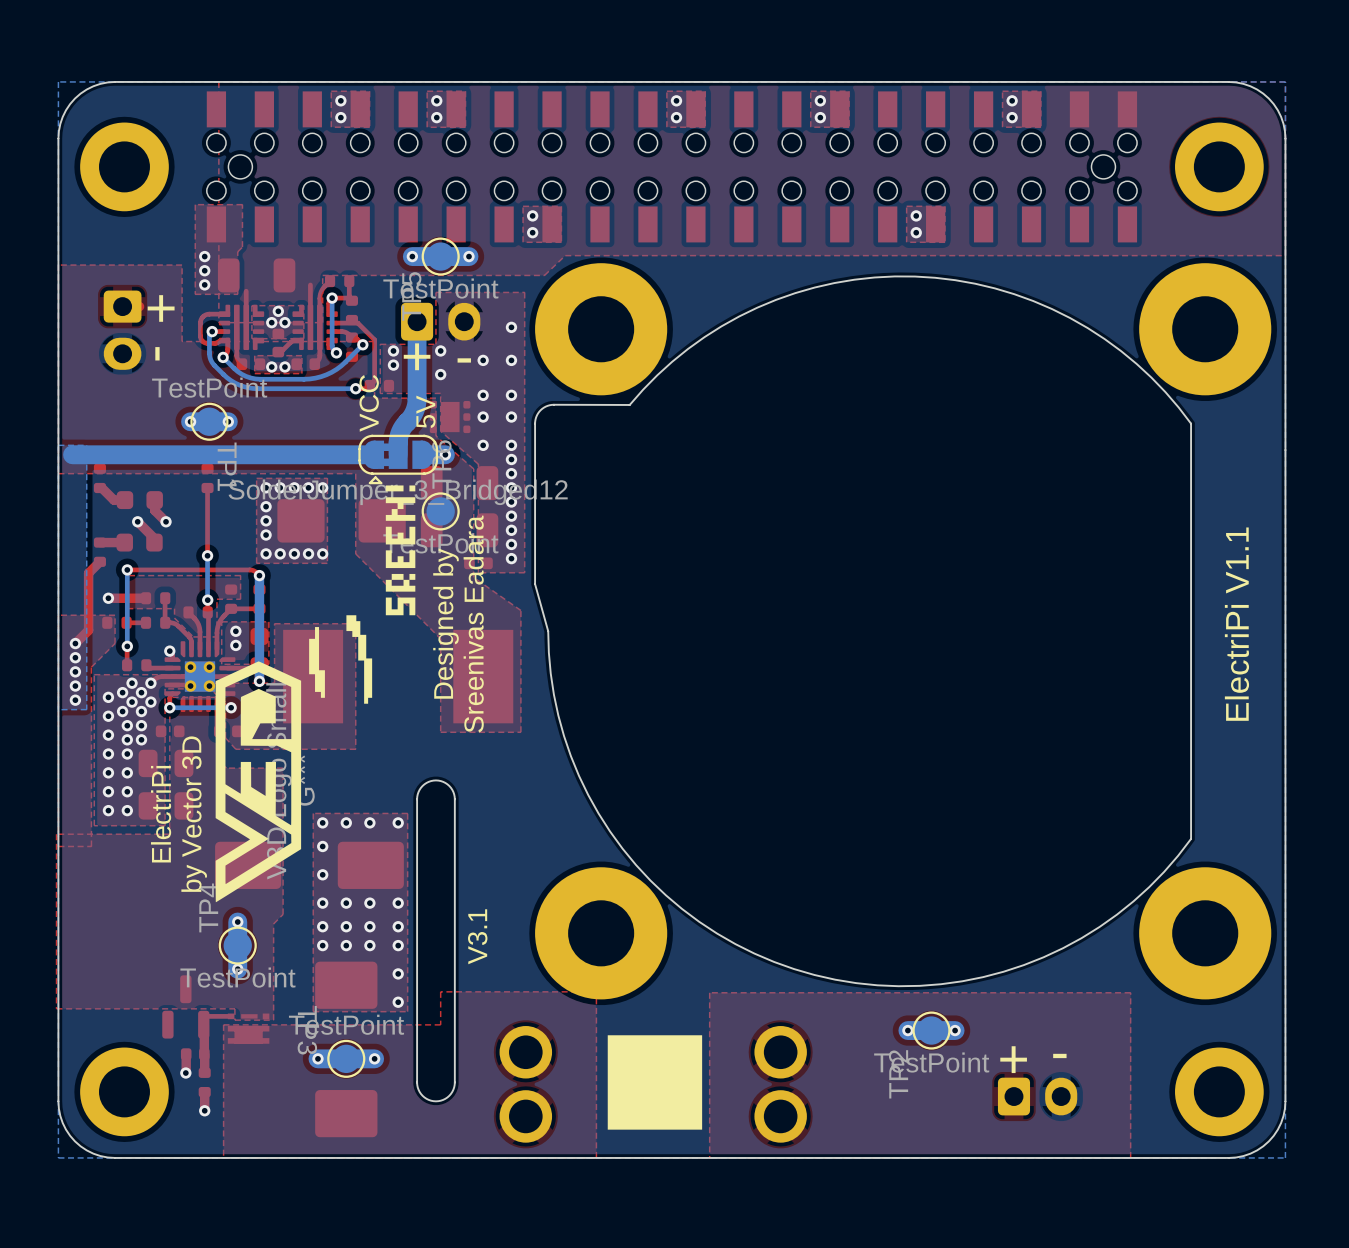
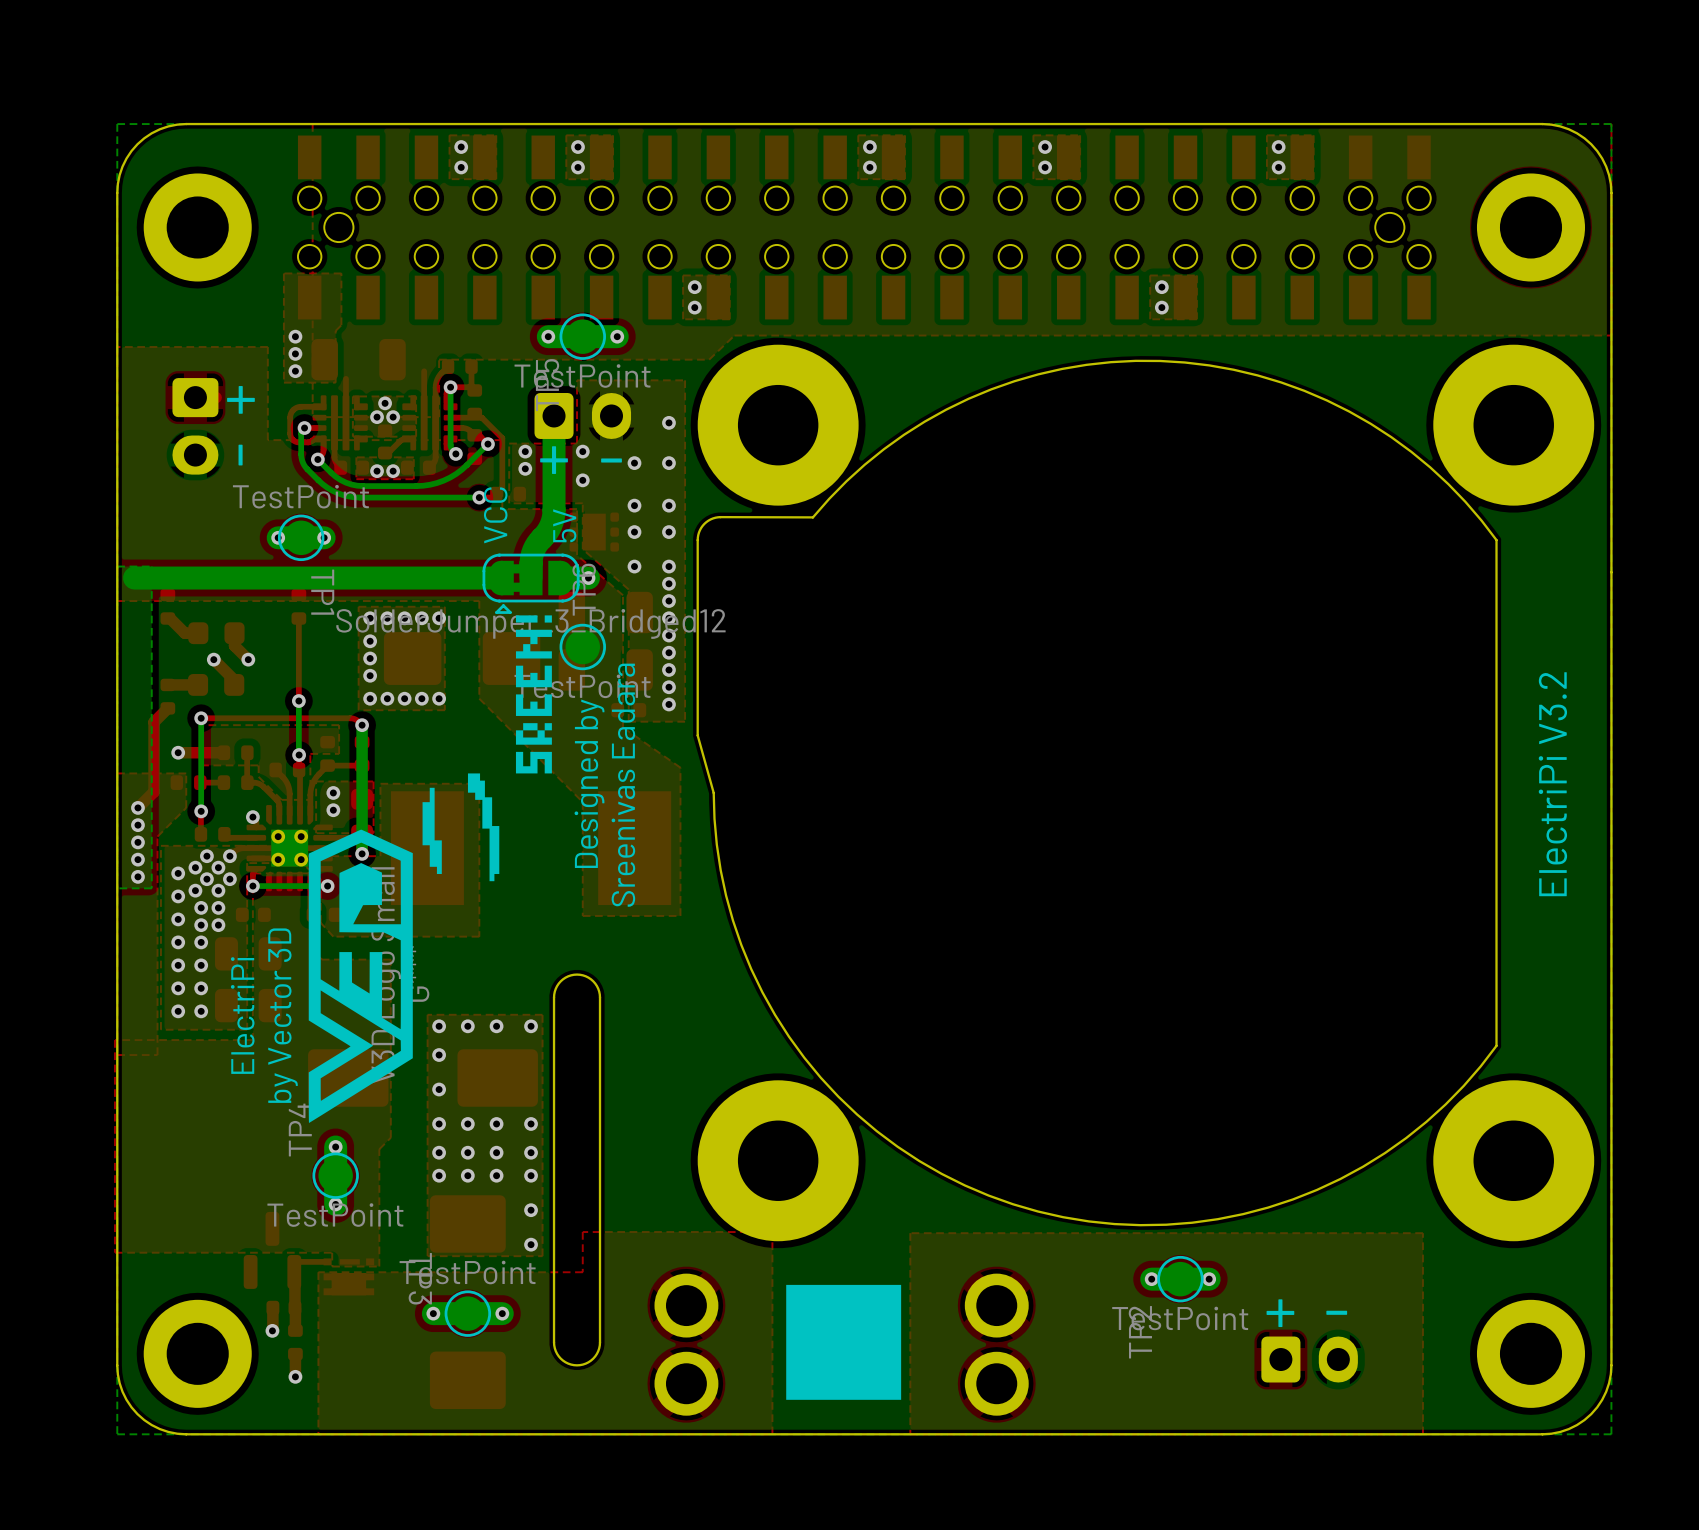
text: ElectriPi V1.1 (1236, 624) -> ElectriPi V3.2 (1552, 784)
text: V3.1 (477, 936) -> none

